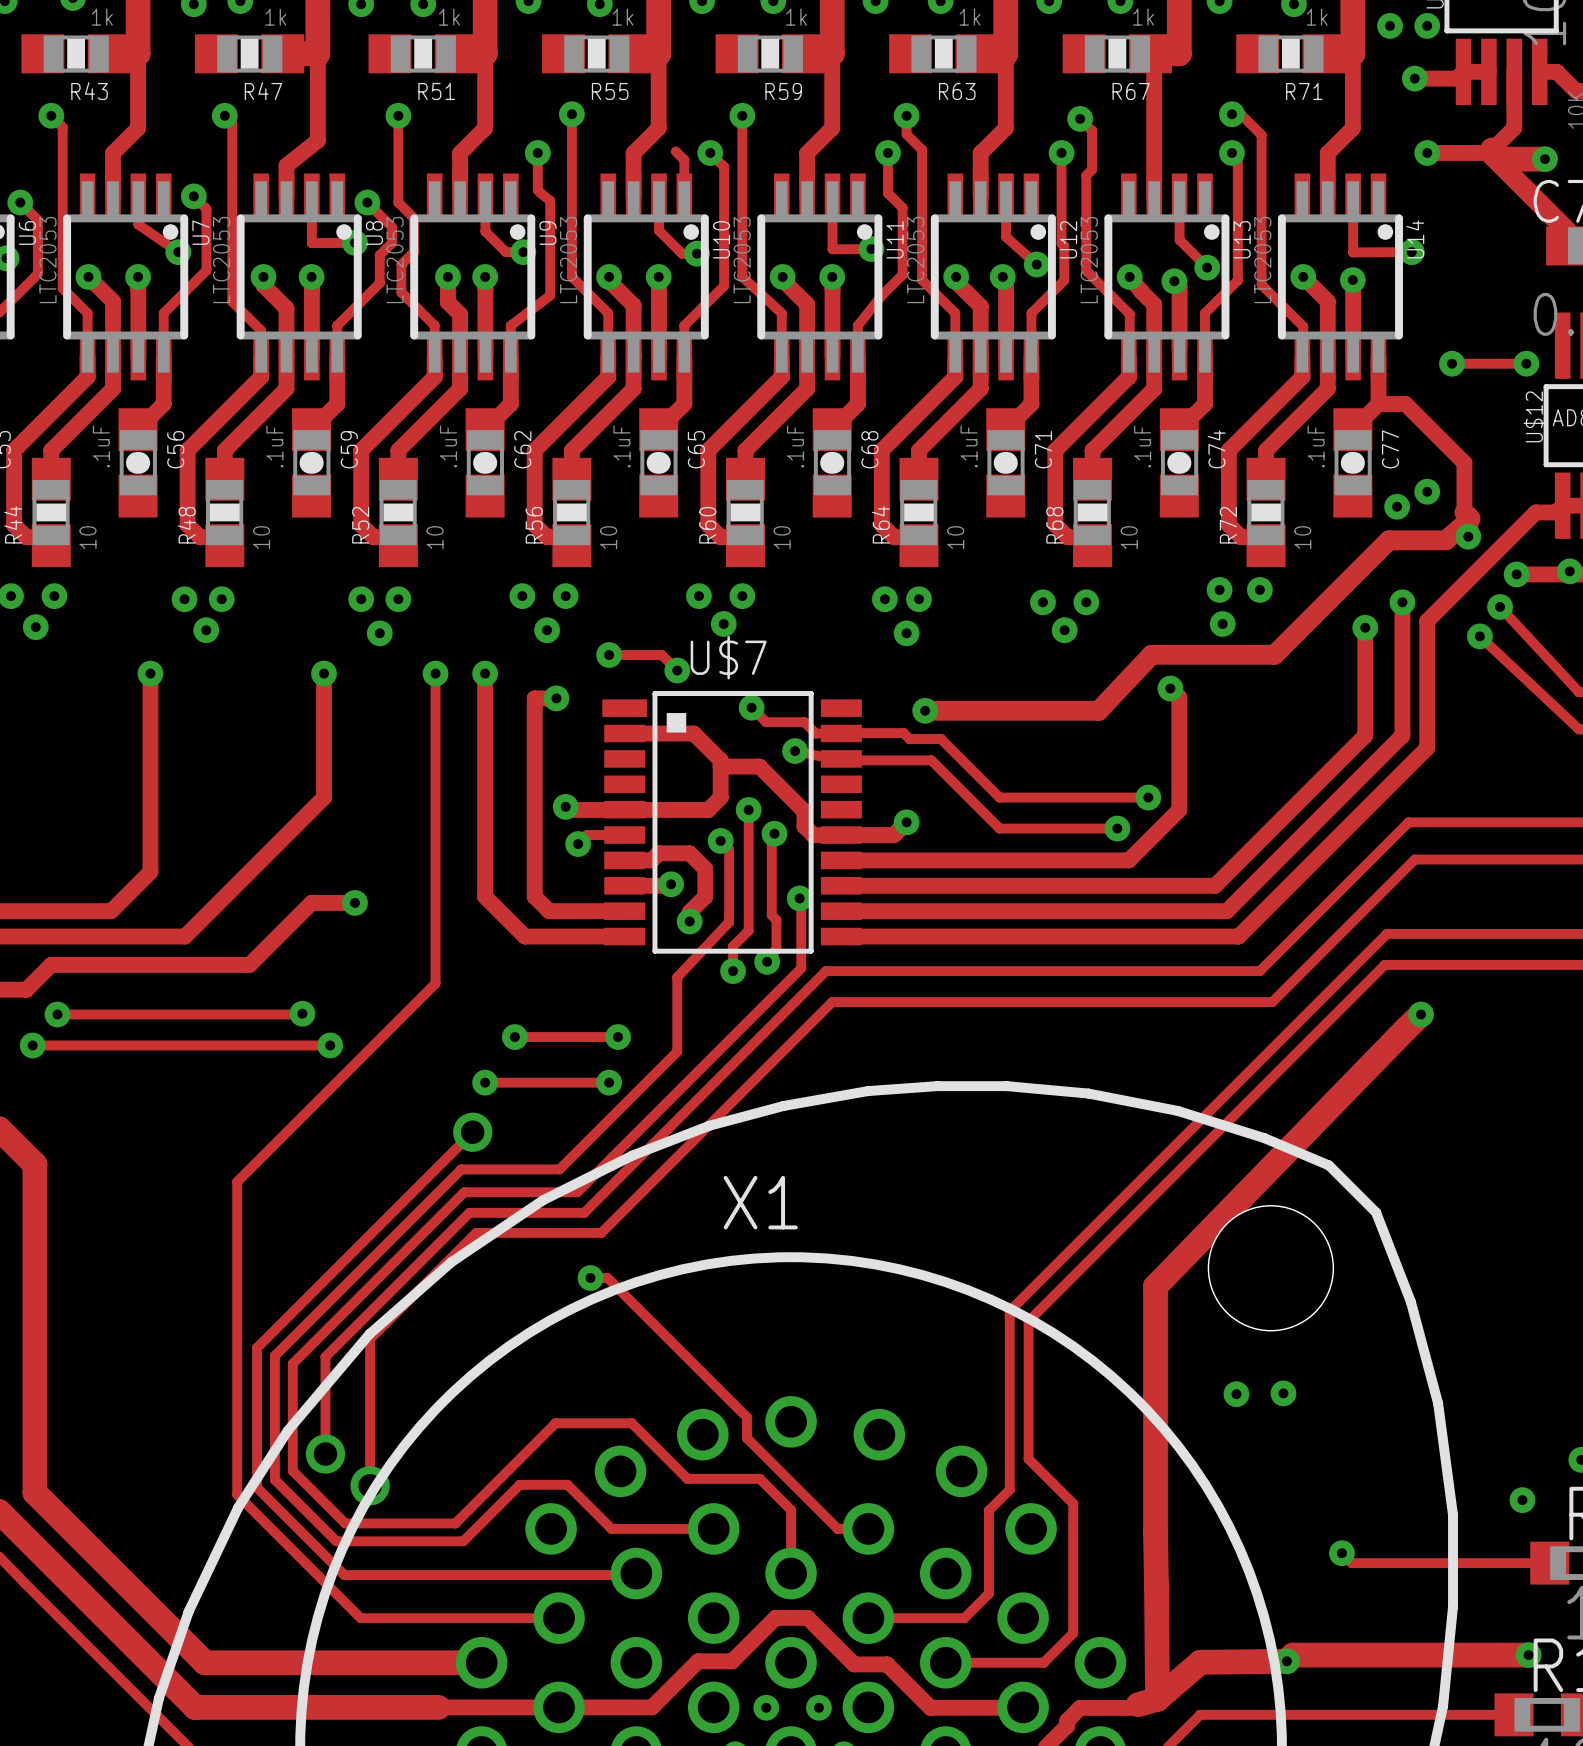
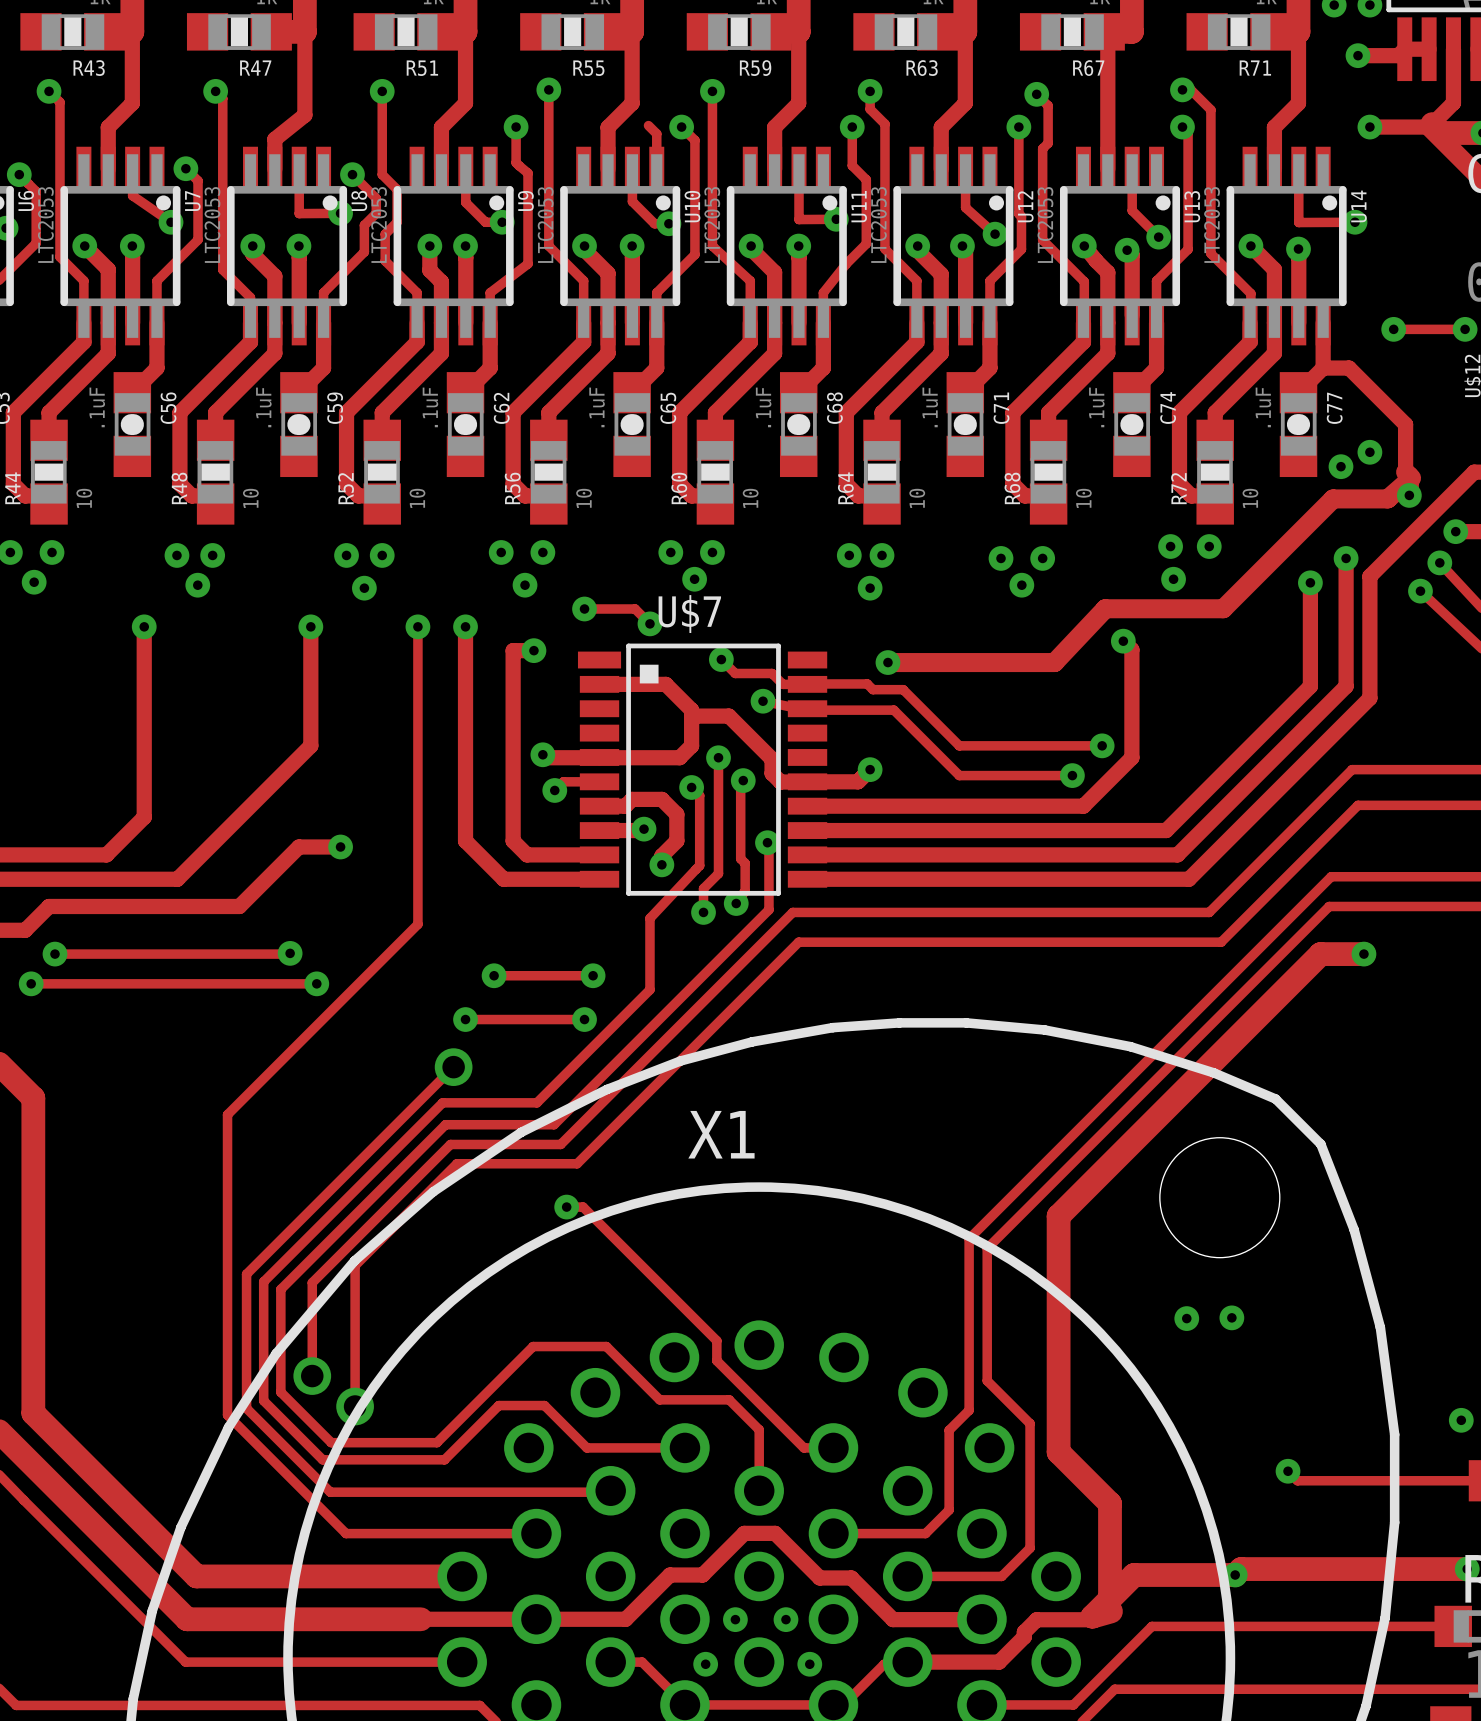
track: (1421, 1014) (1155, 1286) (1157, 1699) (1200, 1662) (1286, 1661) -> (1363, 954) (1320, 954) (1058, 1216) (1058, 1452) (1110, 1503) (1110, 1599)
track: none -> (1235, 1575) (1134, 1575) (1092, 1616)

